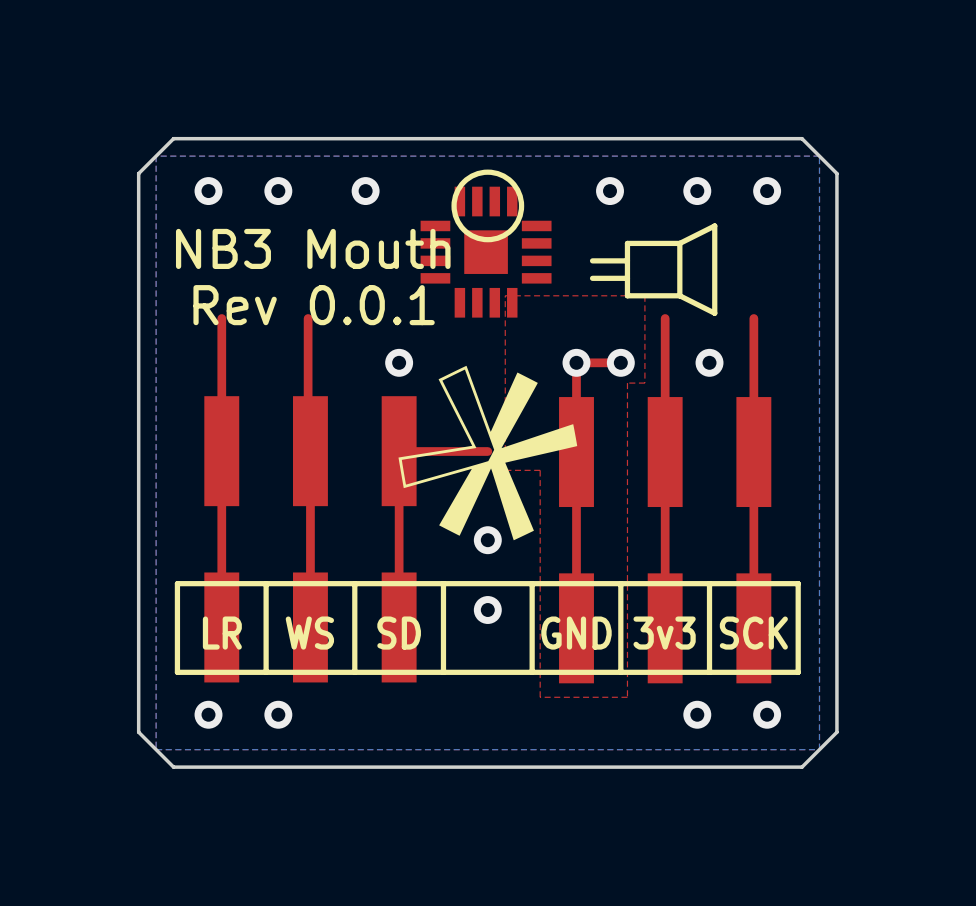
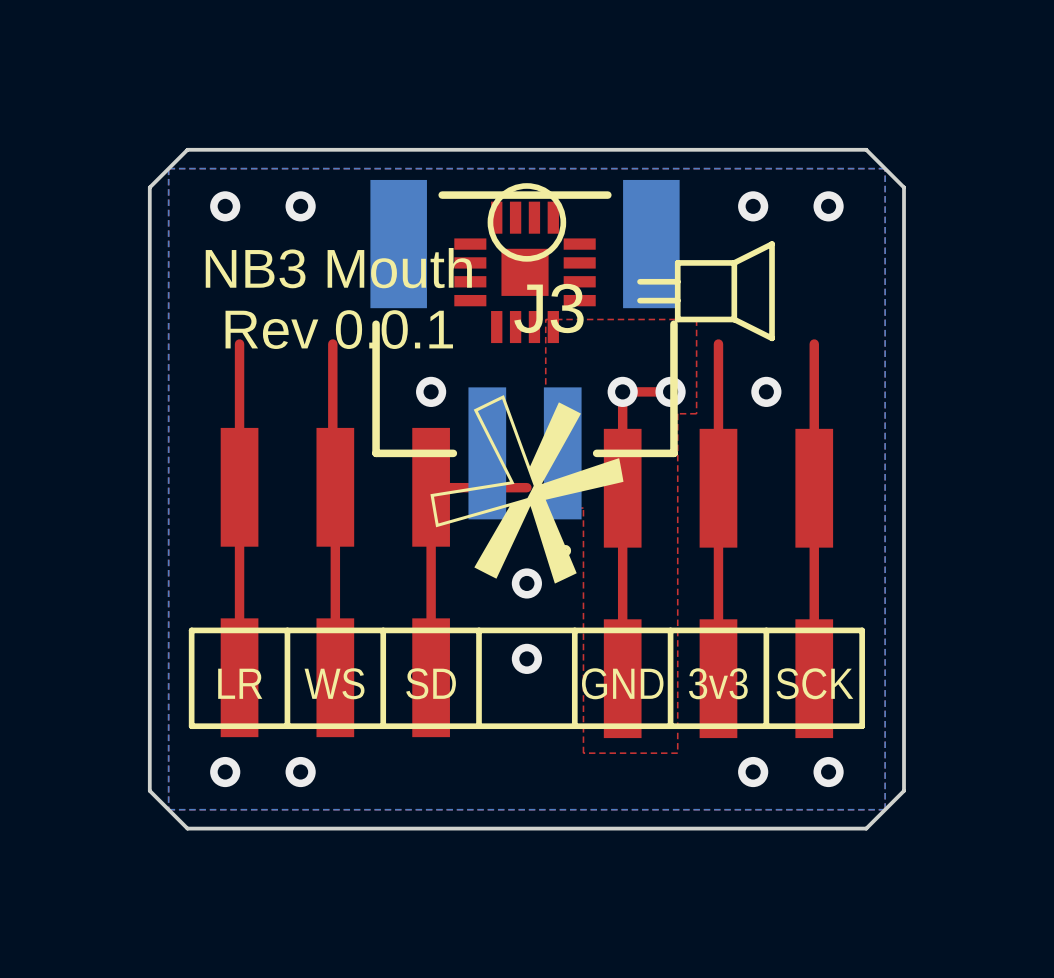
via: (365, 191) -> none
via: (610, 191) -> none
J3: none -> (525, 368)

